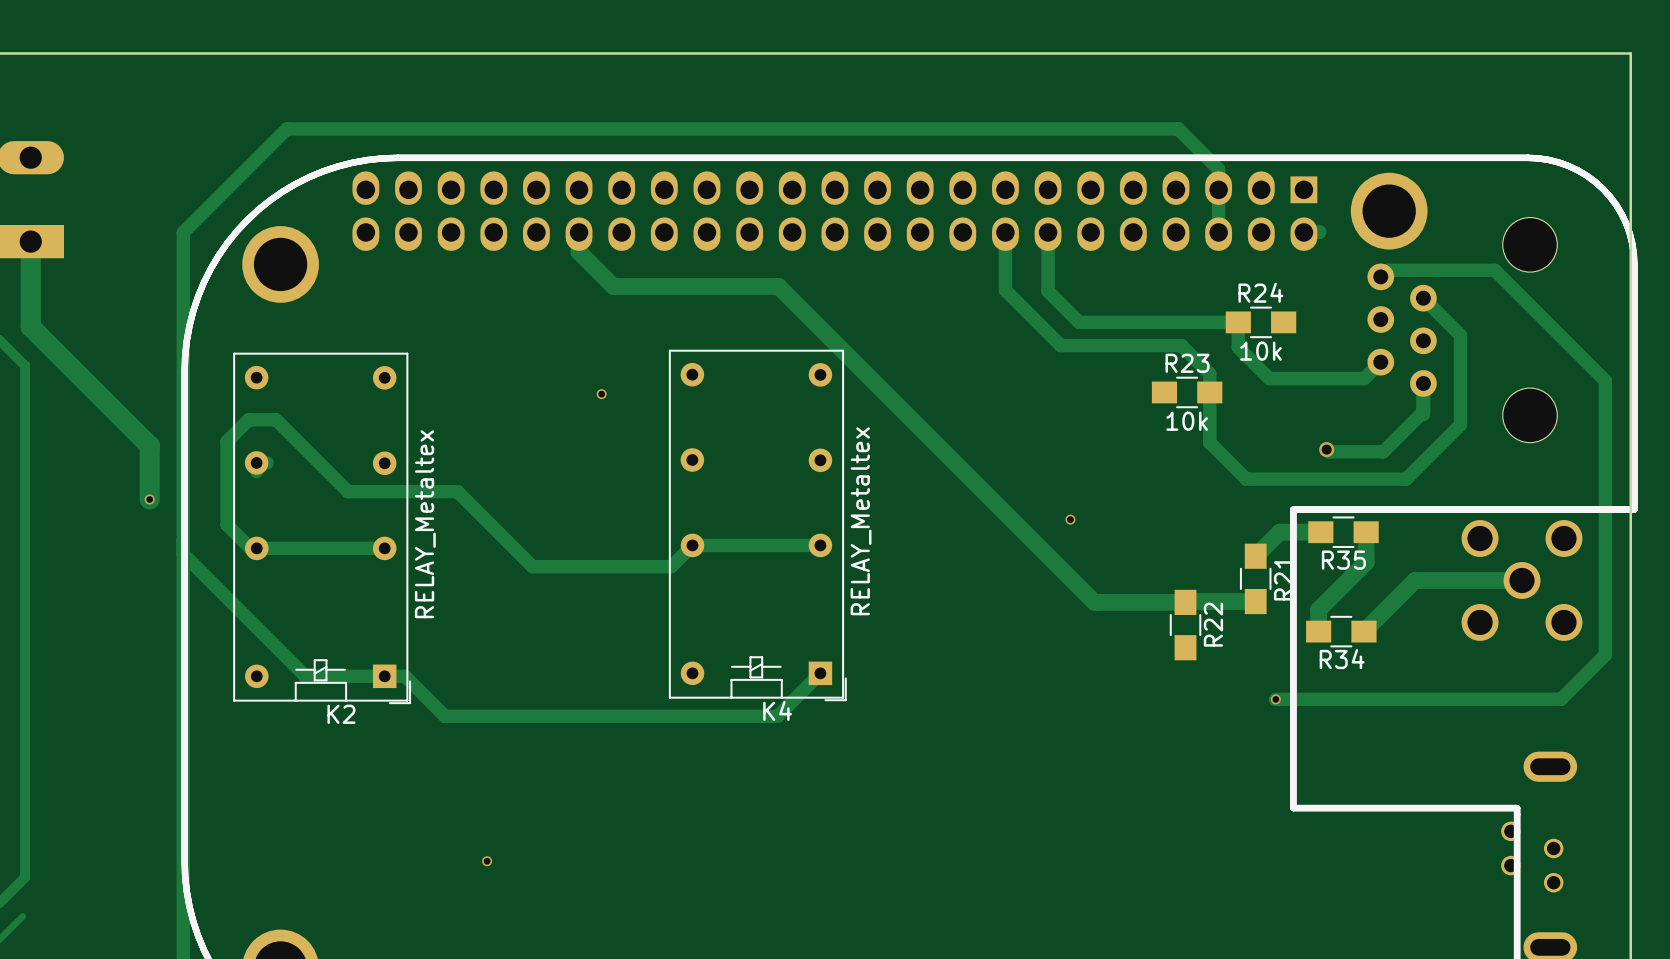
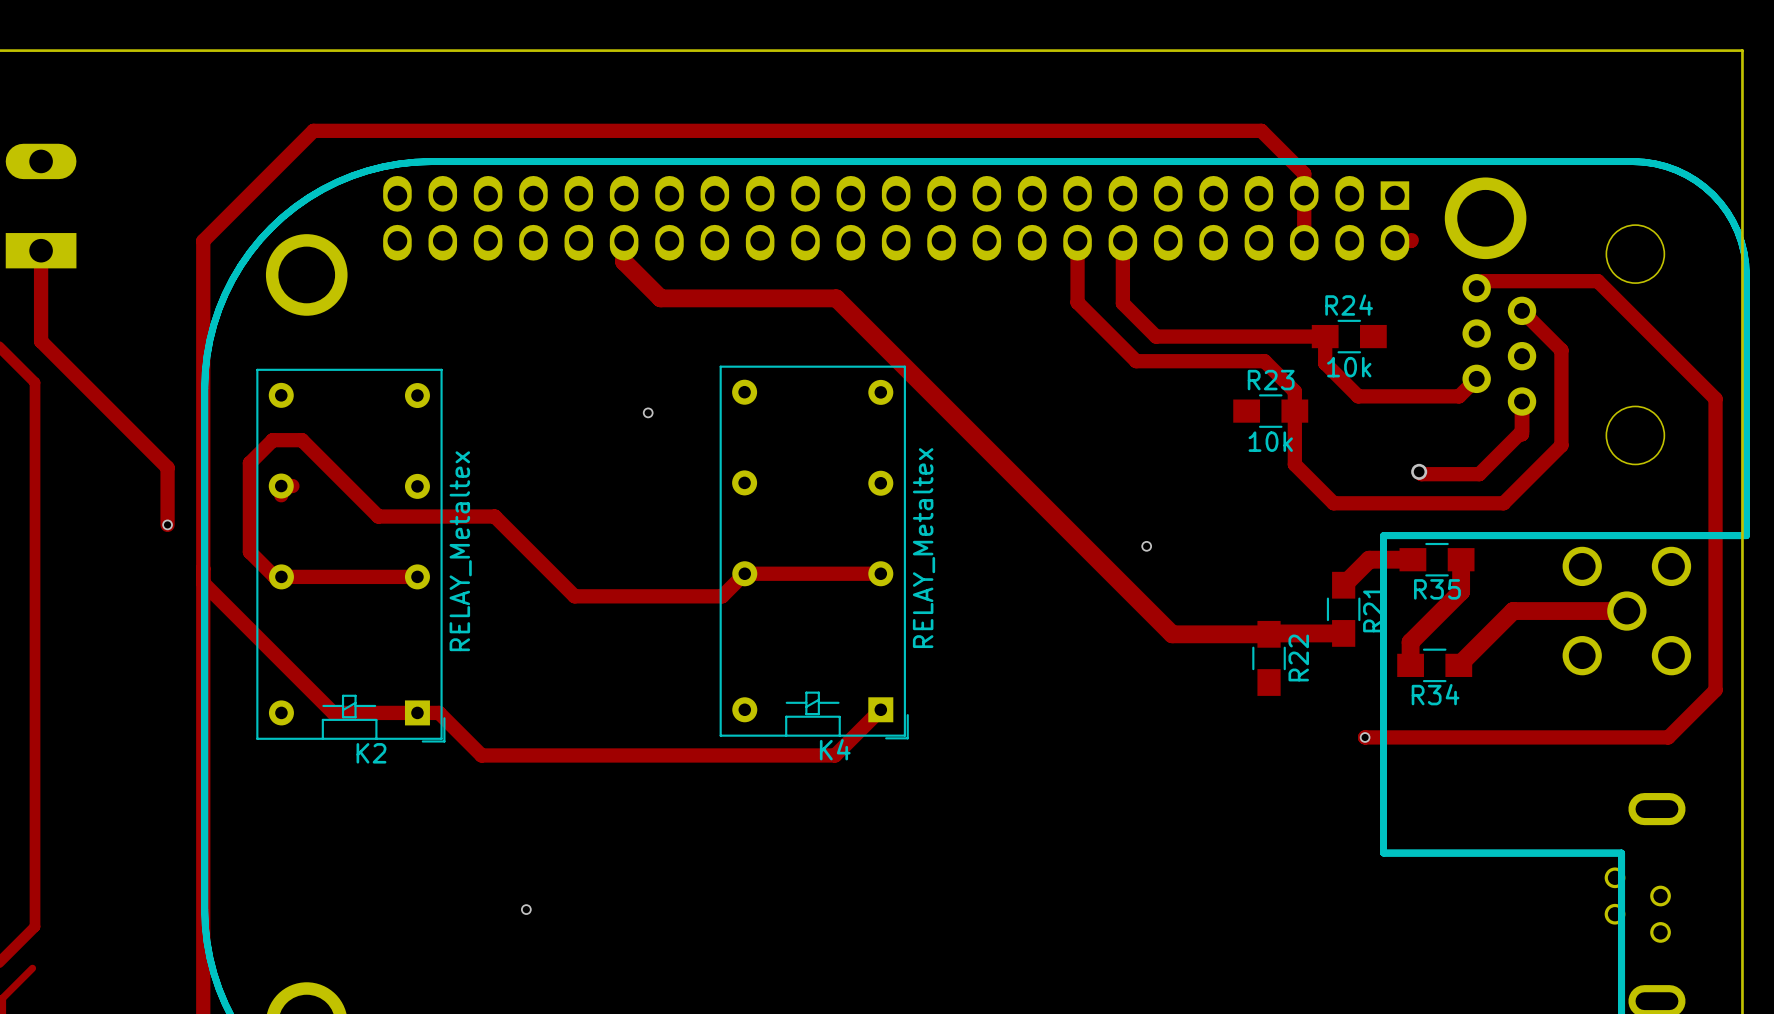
track width: thick (30, 241) (30, 326) (149, 445) (149, 499) -> thin (41, 250) (41, 341) (167, 467) (167, 524)

